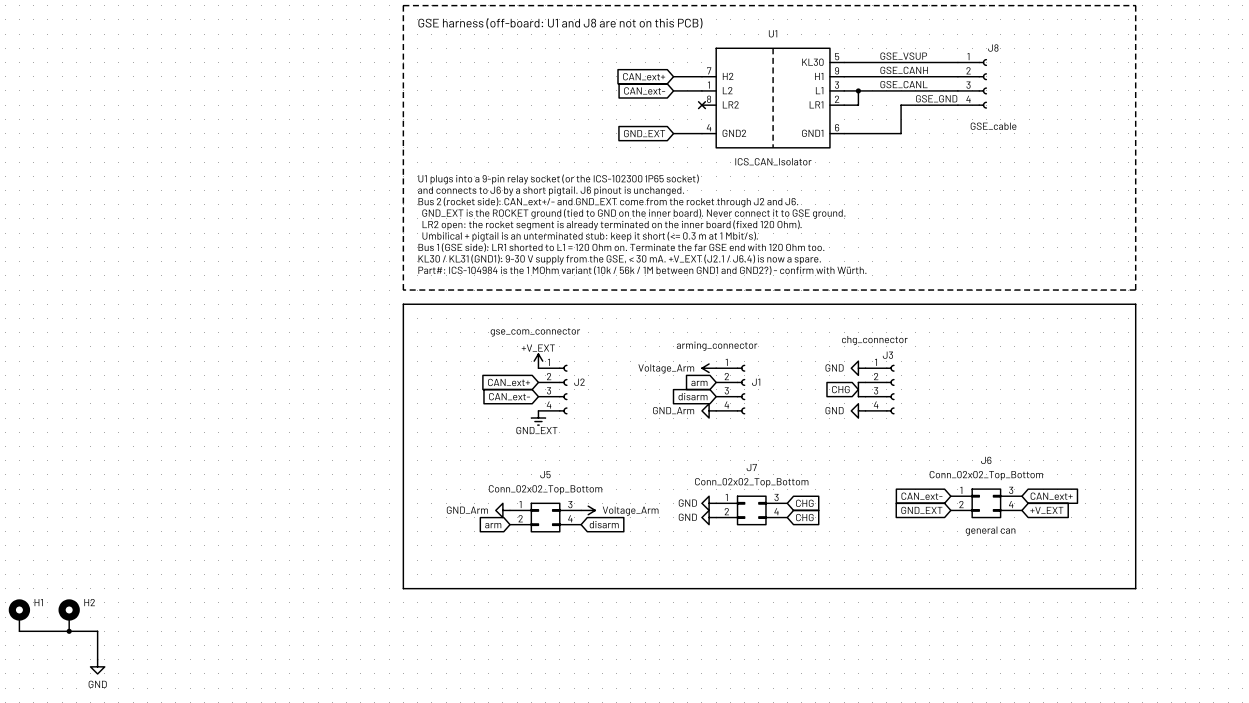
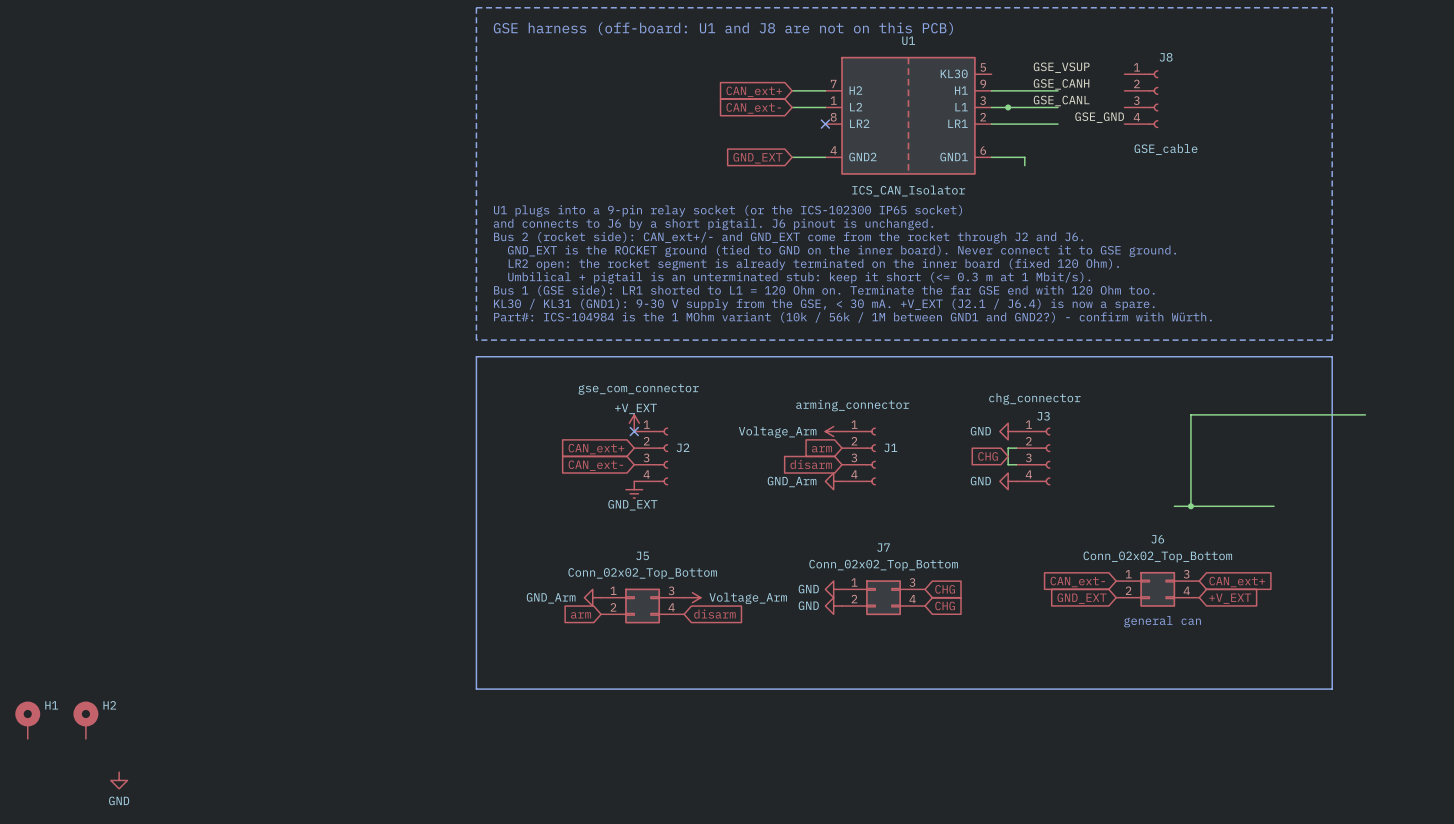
wire: (844, 62) (957, 62) -> none
wire: (901, 76) (957, 76) -> none
wire: (858, 90) (858, 105) -> (1058, 124) (1008, 124)
wire: (901, 90) (957, 90) -> none
wire: (957, 105) (901, 105) (901, 133) (872, 133) -> (1024, 165) (1024, 157)
wire: none -> (1365, 414) (1190, 414) (1190, 506)
no-connect mark: none -> (634, 431)
wire: none -> (1174, 506) (1274, 506)
junction: none -> (1190, 506)
wire: (19, 631) (97, 631) (97, 659) -> none
junction: (69, 631) -> none

